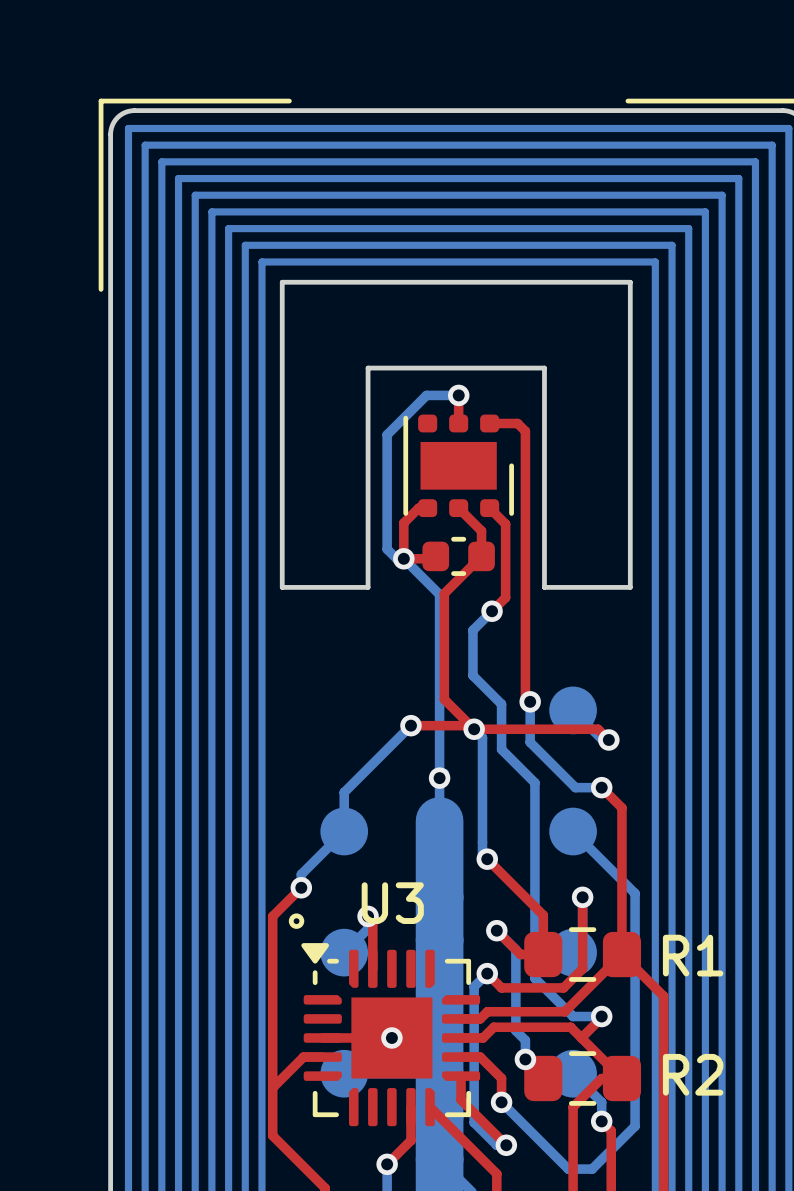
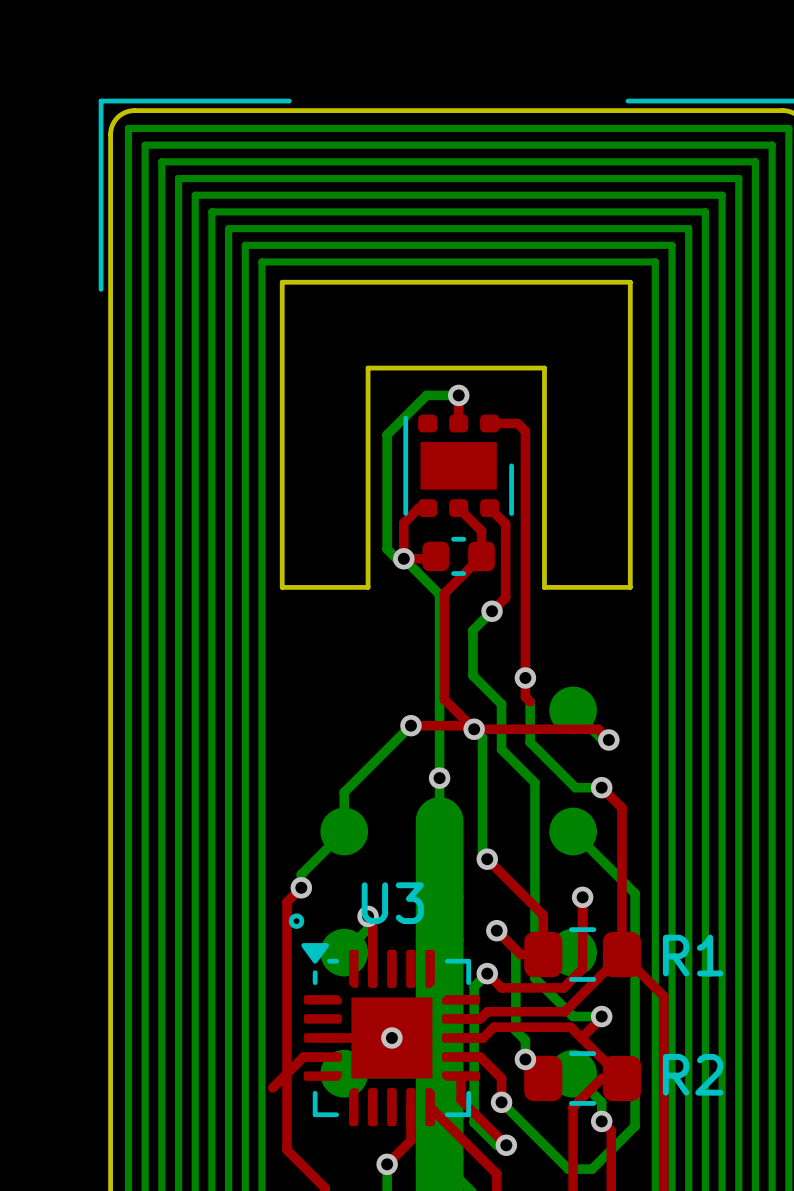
via position: (530, 701) -> (525, 677)
top track: (287, 902) (272, 916) (272, 1135) (287, 1150) -> (287, 902) (287, 1150)

